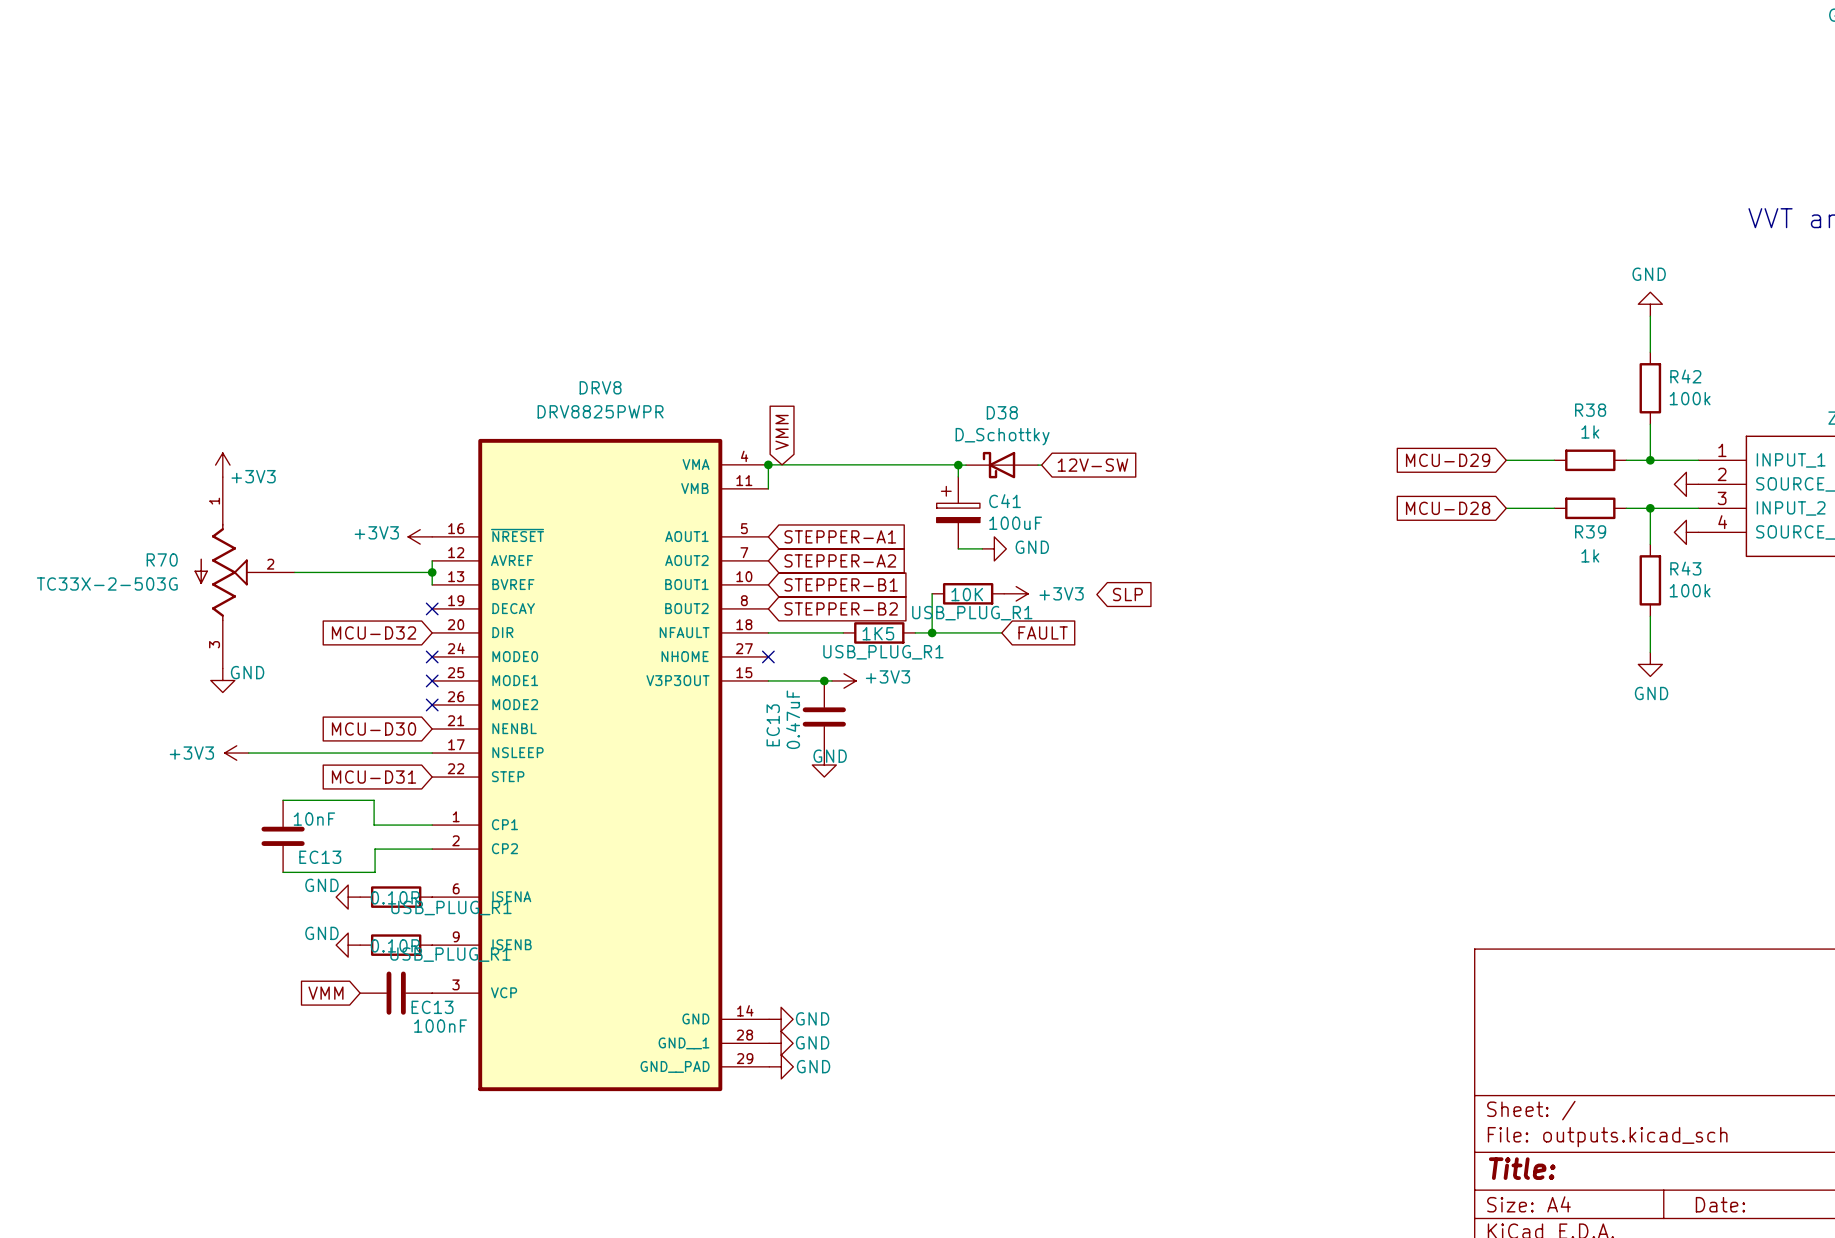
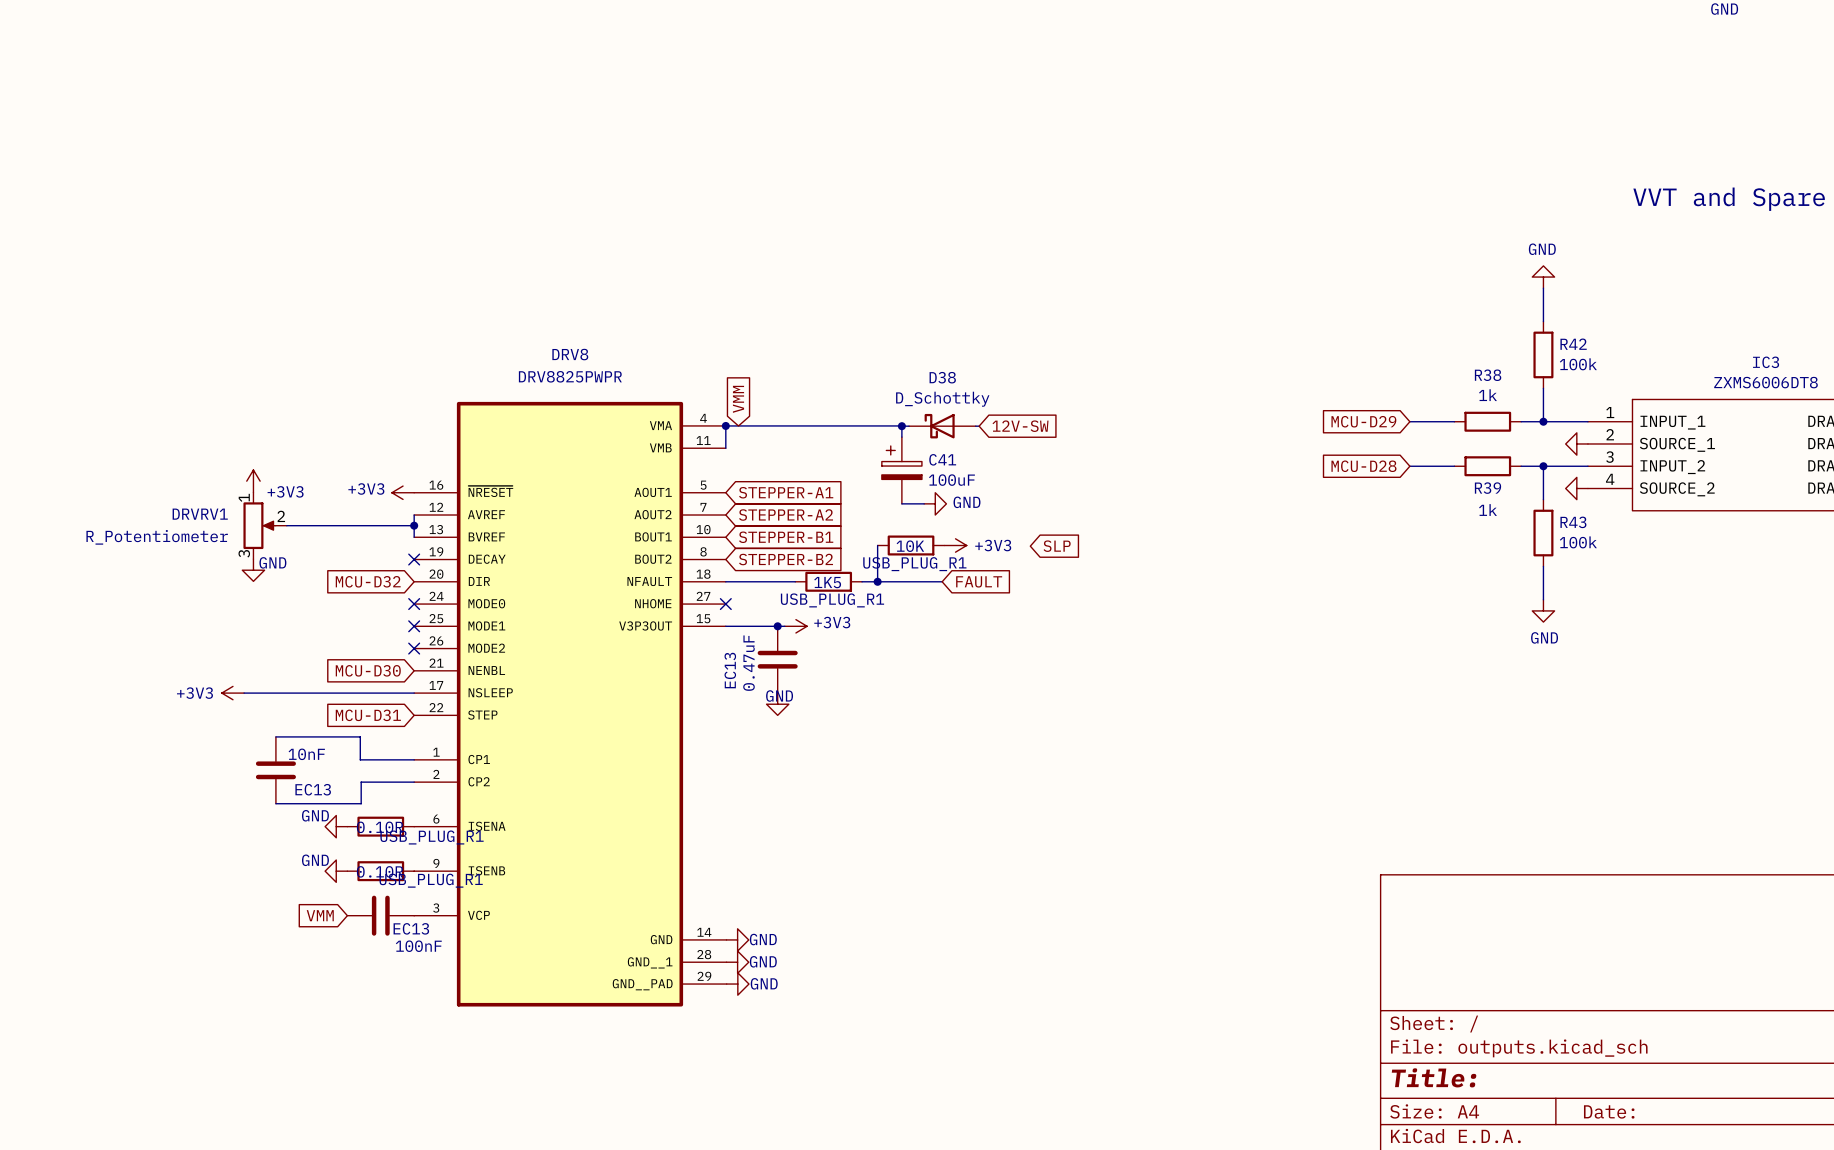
power symbol position: +3V3 (222, 465) -> +3V3 (253, 481)
R70: TC33X-2-503G (244, 572) -> none
DRVRV1: none -> R_Potentiometer (265, 525)
power symbol position: GND (222, 680) -> GND (253, 570)

